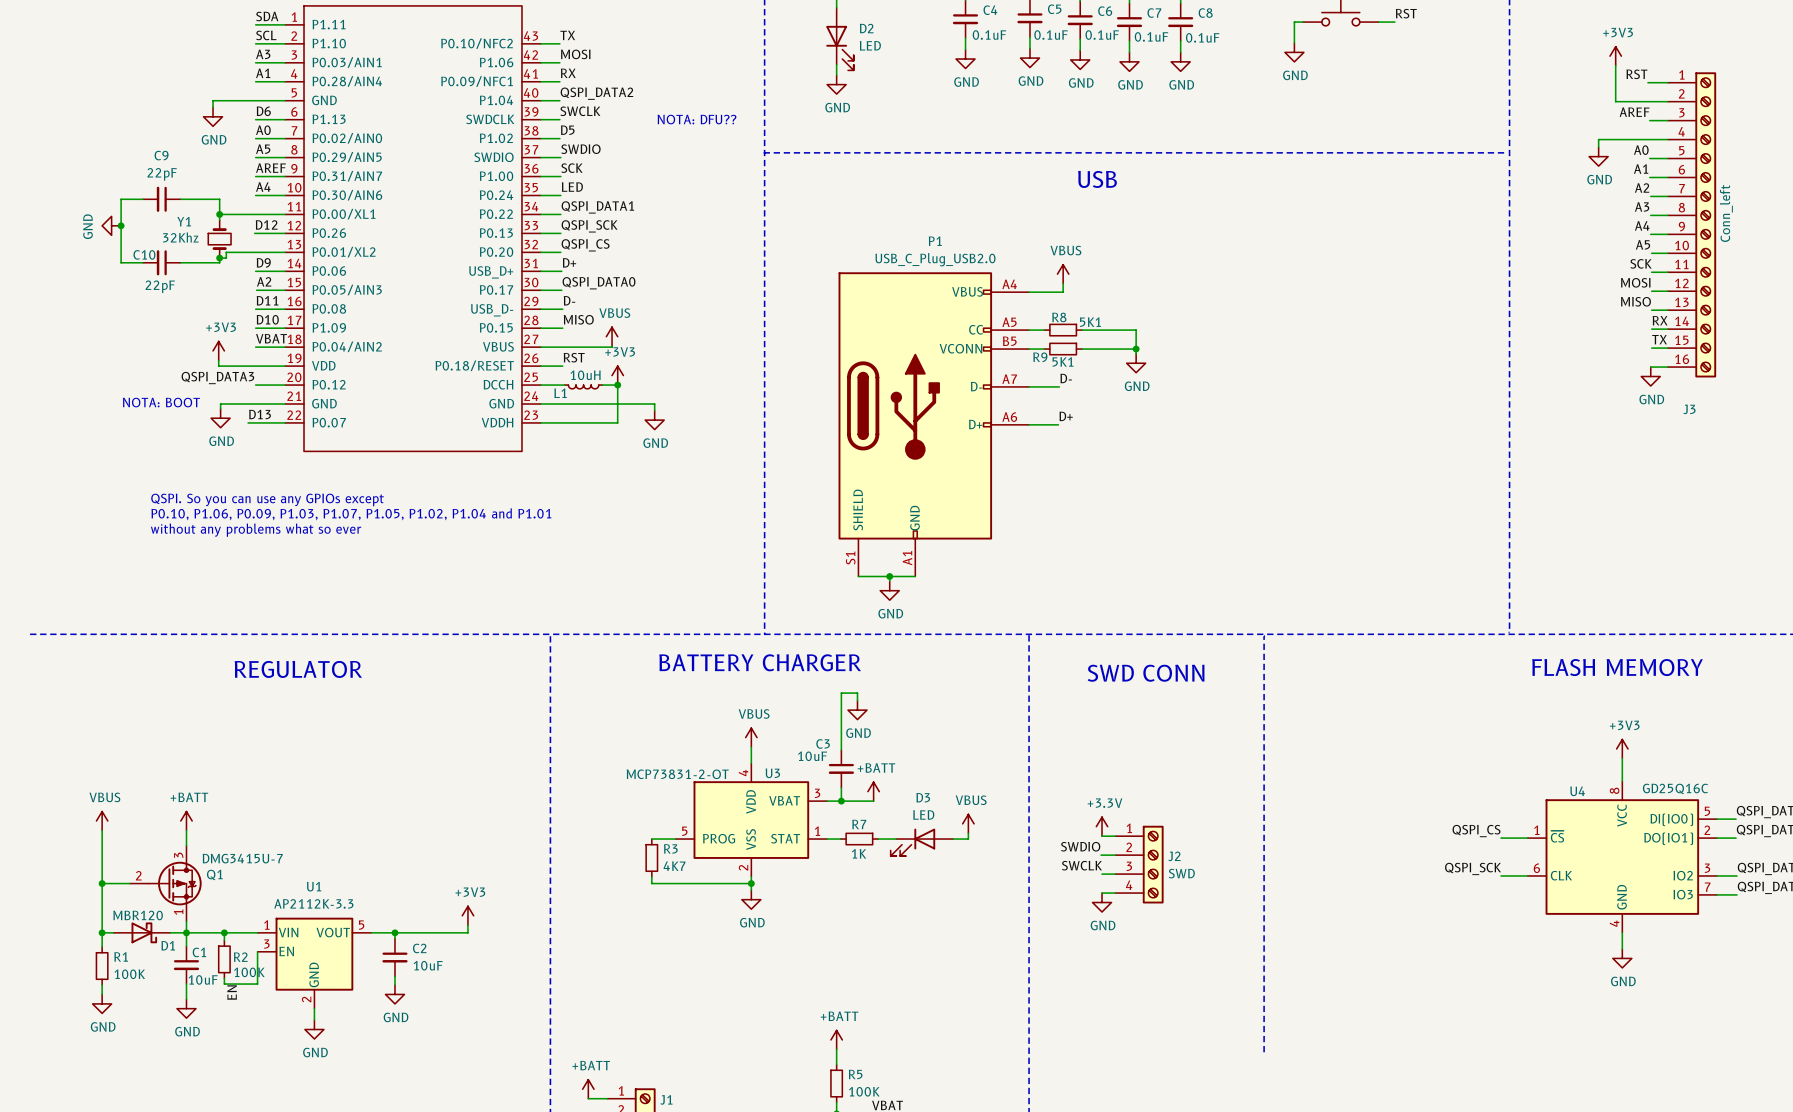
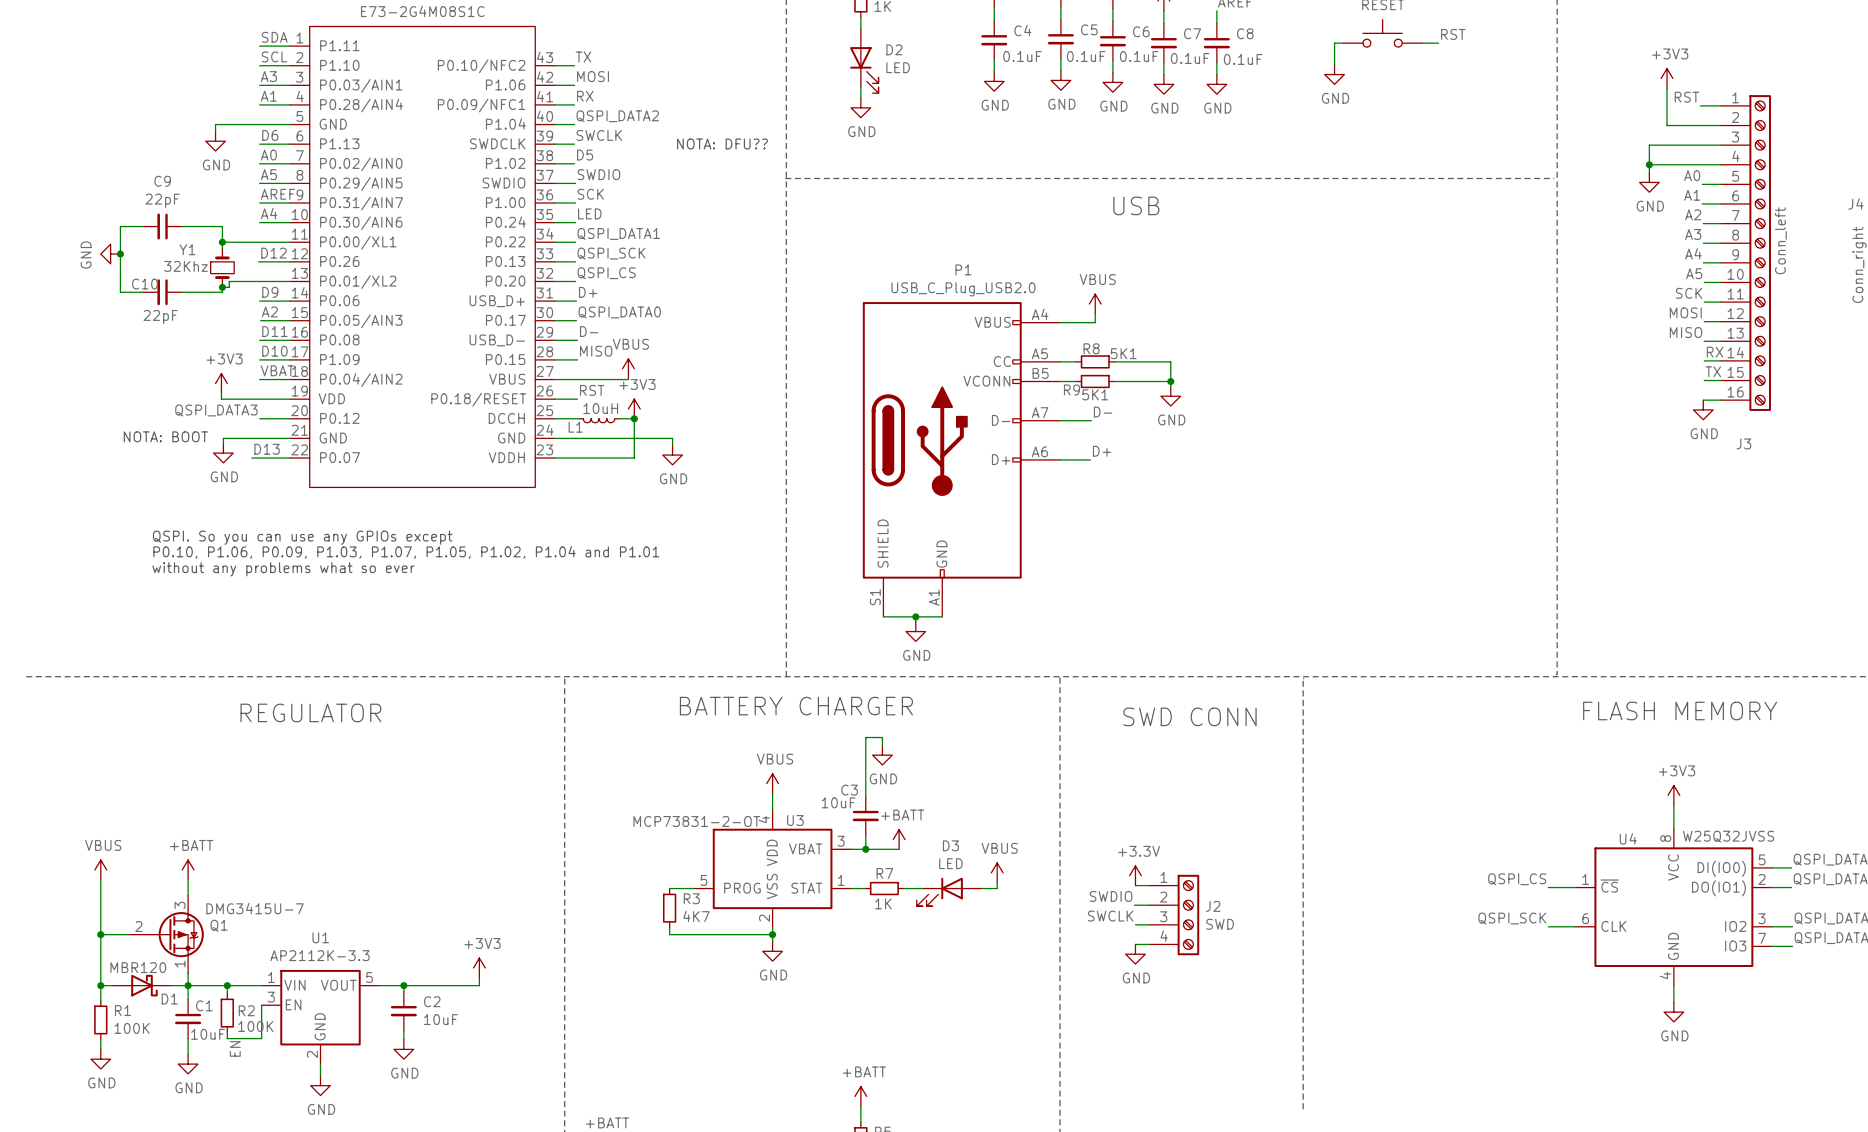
label: AREF (1634, 112) -> none
wire: none -> (1702, 145) (1649, 145) (1649, 164)
junction: none -> (1649, 164)
U4 value: GD25Q16C (1675, 788) -> W25Q32JVSS (1728, 836)

